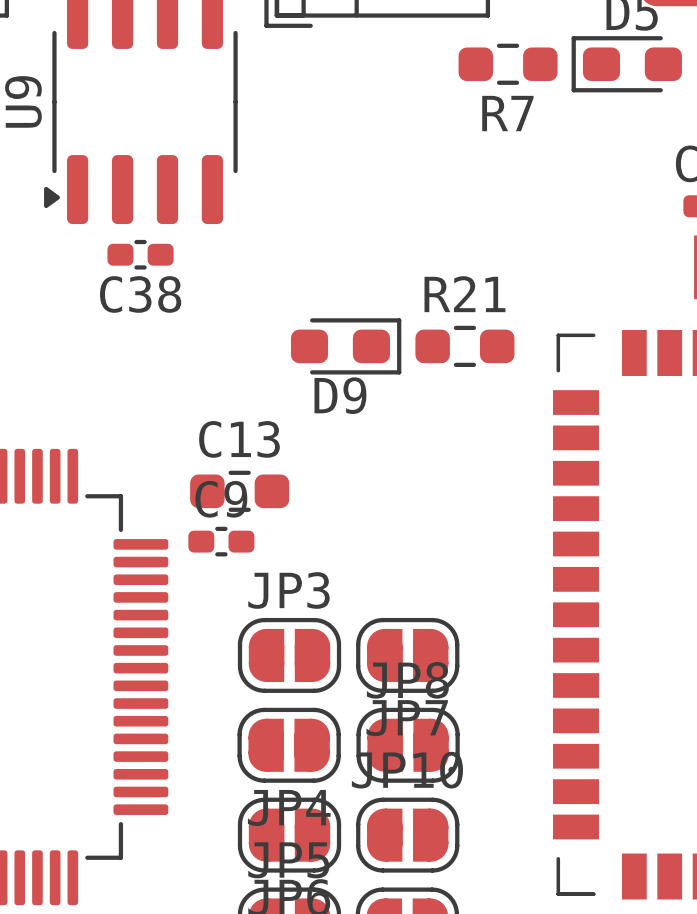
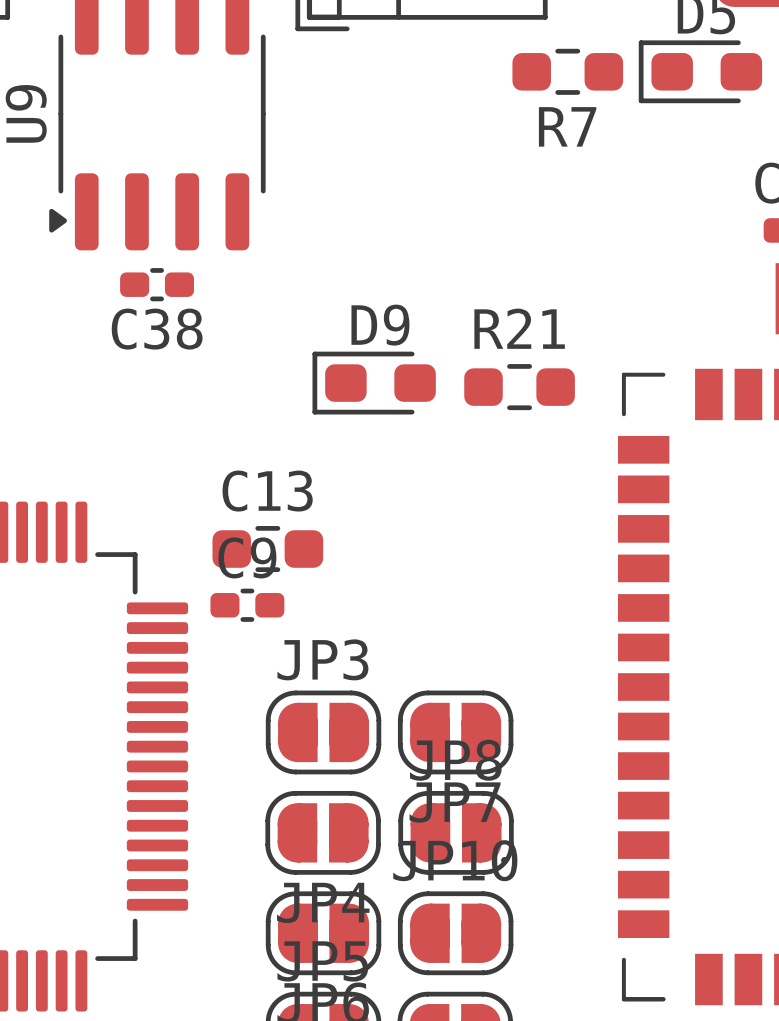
D9 rotation: 0° (346, 346) -> 180° (374, 383)

